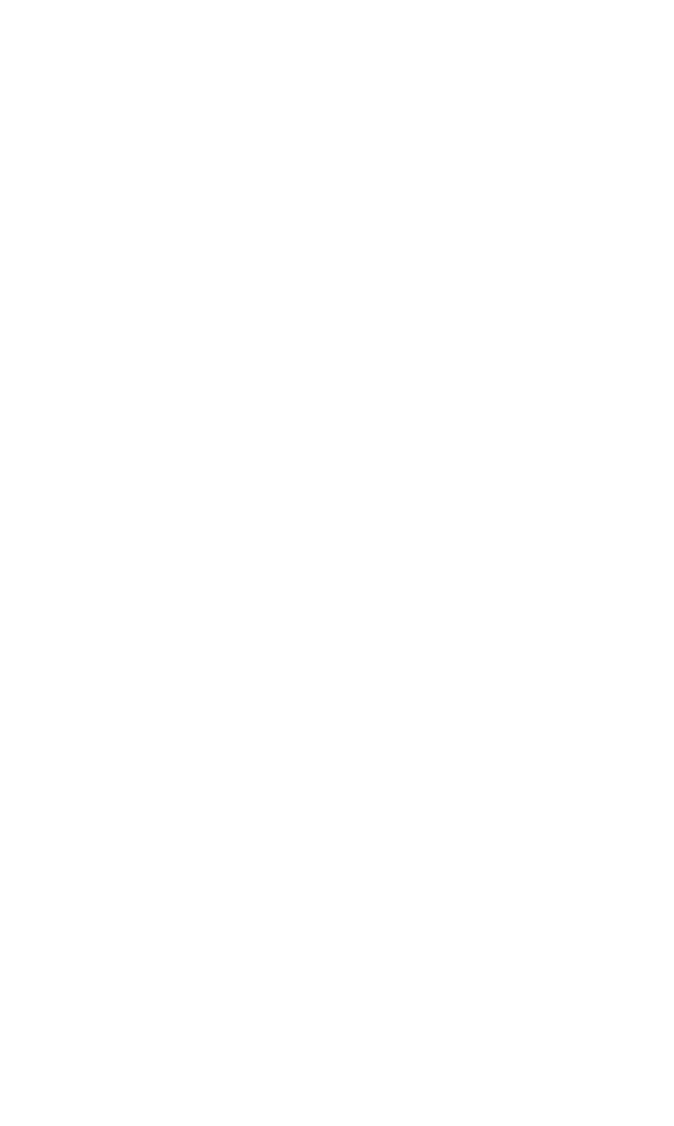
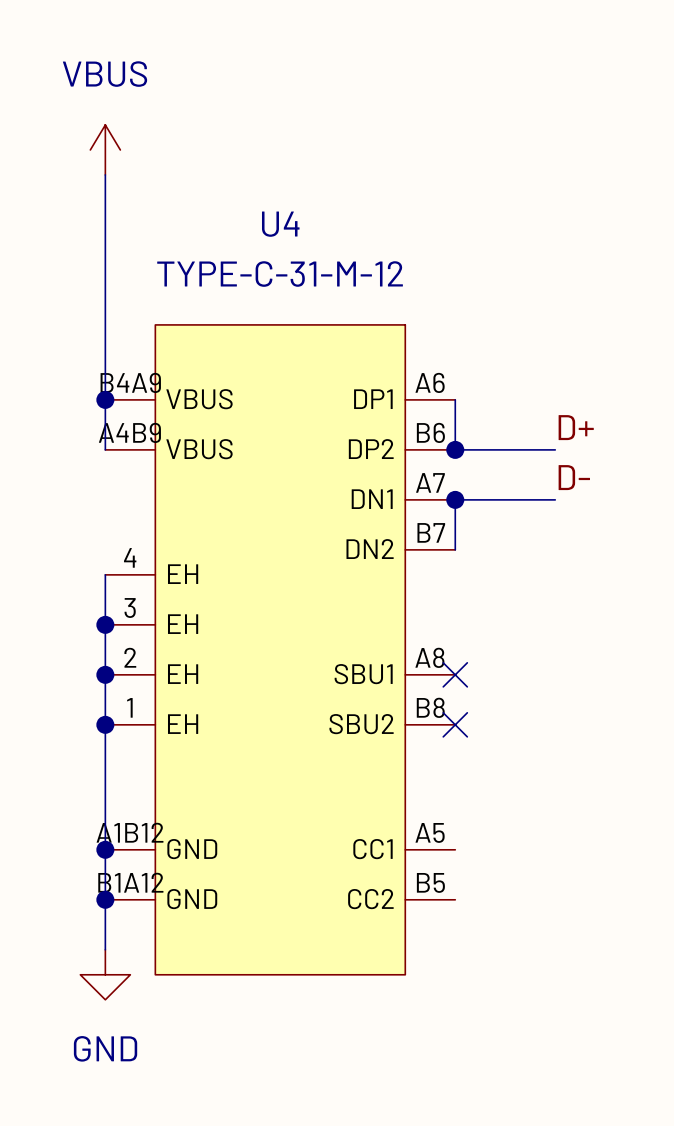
power symbol: none -> VBUS (105, 149)
wire: none -> (105, 174) (105, 449)
junction: none -> (105, 399)
wire: none -> (455, 399) (455, 449) (555, 449)
label: none -> D+ (576, 427)
junction: none -> (455, 449)
label: none -> D- (574, 477)
junction: none -> (455, 499)
wire: none -> (555, 499) (455, 499) (455, 549)
wire: none -> (105, 574) (105, 949)
junction: none -> (105, 624)
U4: none -> TYPE-C-31-M-12 (280, 649)
junction: none -> (105, 674)
no-connect mark: none -> (455, 674)
junction: none -> (105, 724)
no-connect mark: none -> (455, 724)
junction: none -> (105, 849)
junction: none -> (105, 899)
power symbol: none -> GND (105, 974)

